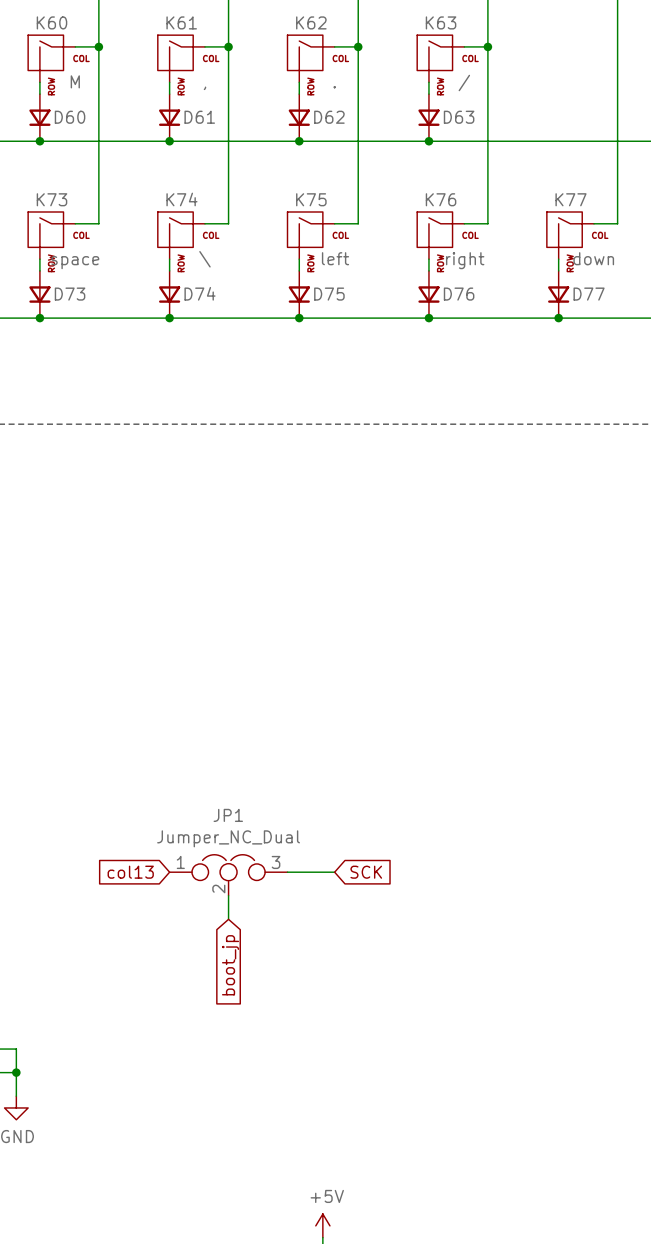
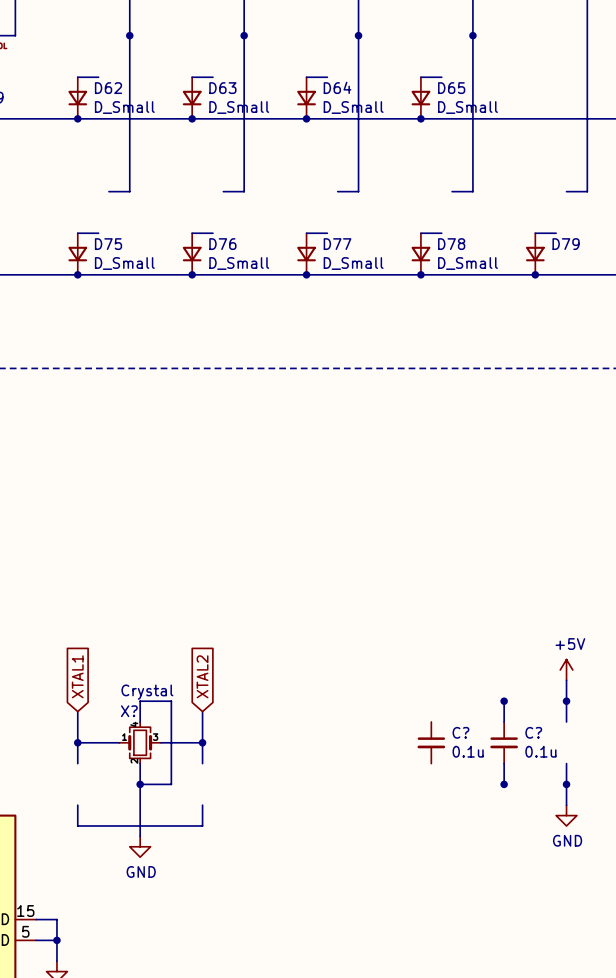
wire: (75, 46) (98, 46) -> none
wire: (204, 46) (228, 46) -> none
wire: (334, 46) (358, 46) -> none
wire: (464, 46) (487, 46) -> none
K60: M (51, 58) -> none
K61: , (181, 58) -> none
K62: . (311, 58) -> none
K63: / (440, 58) -> none
wire: (39, 82) (39, 94) -> (98, 77) (77, 77)
wire: (169, 82) (169, 94) -> (212, 77) (192, 77)
wire: (299, 82) (299, 94) -> (327, 77) (306, 77)
wire: (428, 82) (428, 94) -> (441, 77) (420, 77)
D60 name: D60 (70, 117) -> D62 (108, 88)
D61 name: D61 (199, 117) -> D63 (222, 88)
D62 name: D62 (329, 117) -> D64 (337, 87)
D63 name: D63 (459, 117) -> D65 (451, 88)
D60 value: none -> D_Small (124, 107)
D61 value: none -> D_Small (239, 107)
D62 value: none -> D_Small (353, 107)
D63 value: none -> D_Small (468, 107)
K73: space (51, 235) -> none
K74: \ (181, 235) -> none
K75: left (311, 235) -> none
K76: right (440, 235) -> none
K77: down (570, 235) -> none
wire: (39, 259) (39, 270) -> (98, 233) (77, 233)
wire: (169, 259) (169, 270) -> (212, 233) (192, 233)
wire: (299, 259) (299, 270) -> (327, 233) (306, 233)
wire: (428, 259) (428, 270) -> (441, 233) (420, 233)
wire: (558, 259) (558, 270) -> (556, 233) (535, 233)
D74 name: D74 (200, 293) -> D76 (222, 244)
D73 name: D73 (70, 294) -> D75 (108, 244)
D75 name: D75 (329, 294) -> D77 (337, 244)
D76 name: D76 (459, 294) -> D78 (451, 244)
D77 name: D77 (589, 294) -> D79 (566, 244)
D73 value: none -> D_Small (124, 263)
D74 value: none -> D_Small (239, 263)
D75 value: none -> D_Small (353, 263)
D76 value: none -> D_Small (468, 263)
power symbol: none -> +5V (566, 670)
global label: none -> XTAL1 (77, 676)
global label: none -> XTAL2 (202, 676)
wire: none -> (566, 680) (566, 722)
wire: none -> (504, 701) (504, 722)
junction: none -> (504, 701)
junction: none -> (566, 701)
wire: none -> (77, 711) (77, 763)
wire: none -> (202, 711) (202, 763)
wire: none -> (140, 722) (140, 701) (171, 701) (171, 784) (140, 784)
wire: none -> (77, 742) (119, 742)
junction: none -> (77, 742)
X?: none -> Crystal (140, 742)
junction: none -> (202, 742)
C?: none -> 0.1u (431, 742)
C?: none -> 0.1u (504, 742)
wire: none -> (140, 763) (140, 836)
global label: col13 (130, 872) -> none
wire: (287, 872) (334, 872) -> (160, 742) (202, 742)
global label: SCK (366, 872) -> none
wire: none -> (504, 763) (504, 784)
wire: none -> (566, 763) (566, 805)
JP1: Jumper_NC_Dual (228, 875) -> none
junction: none -> (140, 784)
wire: (228, 895) (228, 919) -> none
junction: none -> (504, 784)
junction: none -> (566, 784)
wire: none -> (77, 805) (77, 825) (202, 825) (202, 805)
power symbol: none -> GND (566, 815)
global label: boot_jp (230, 965) -> none
power symbol: none -> GND (140, 846)

